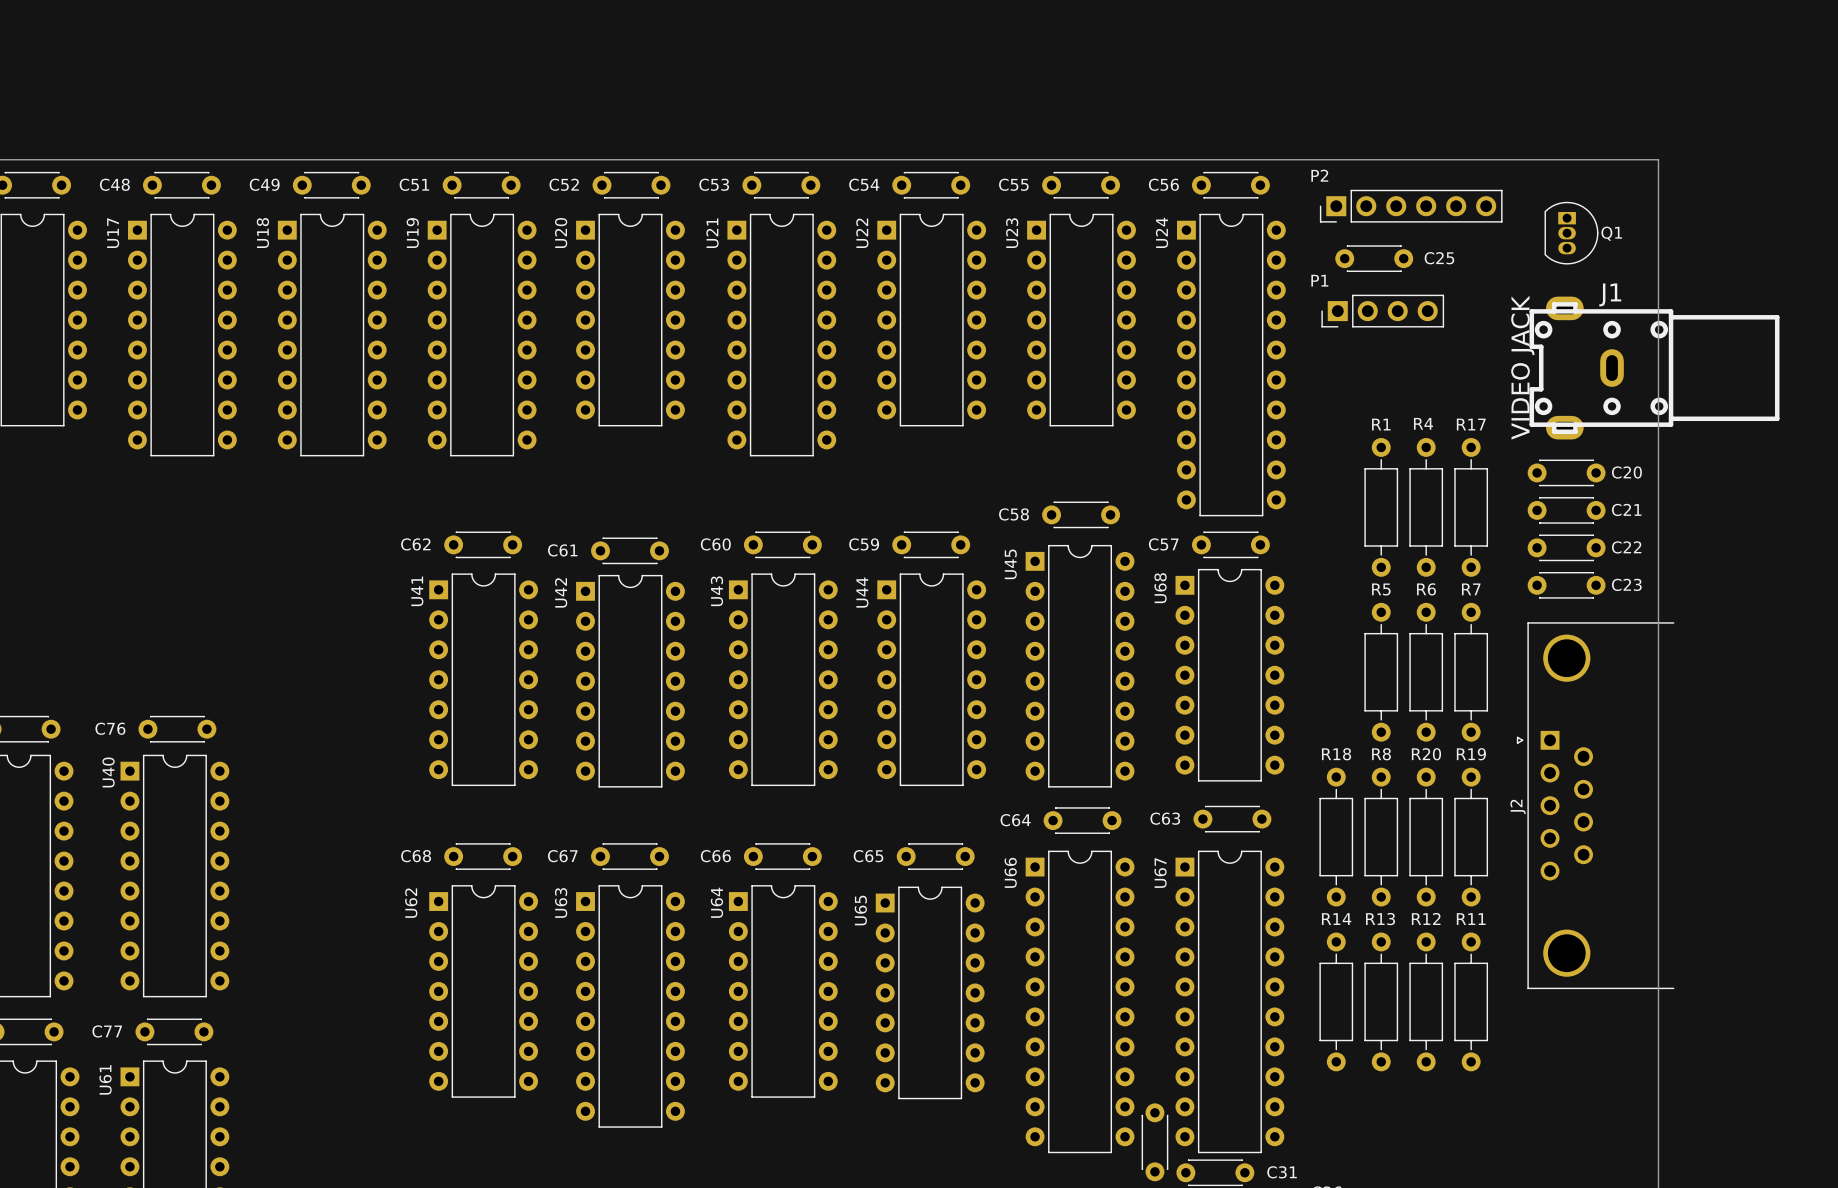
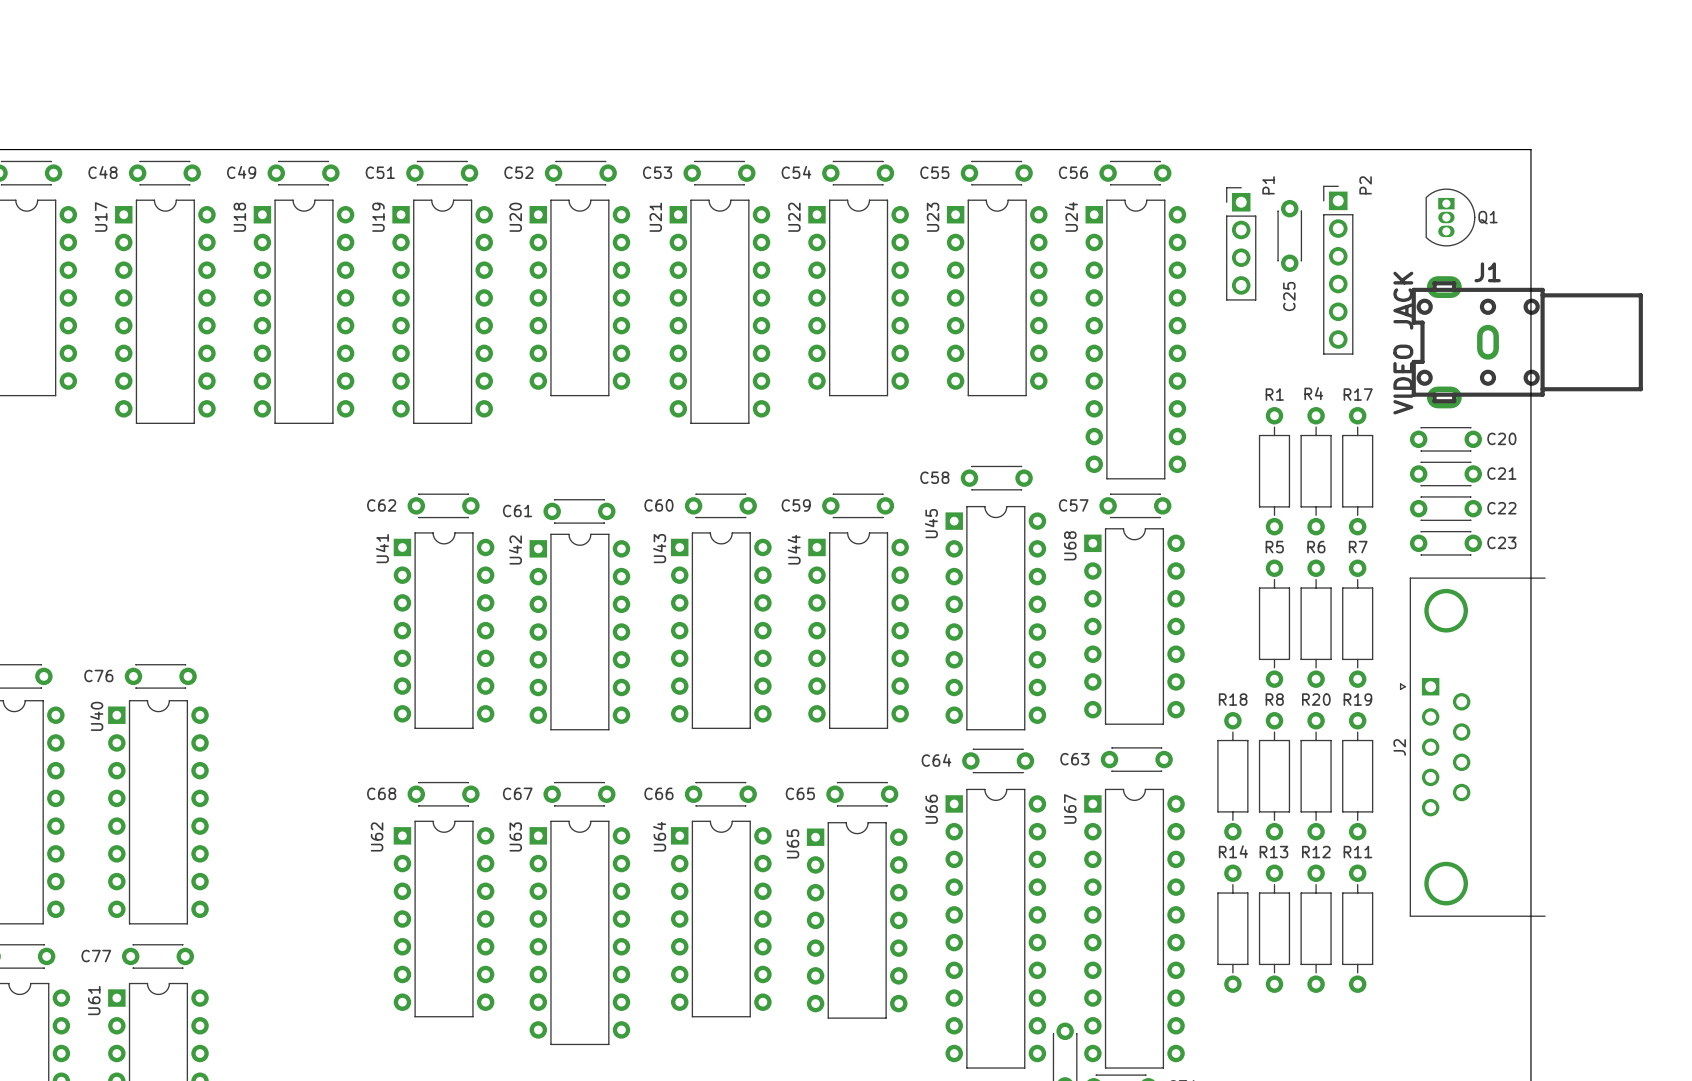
P2 rotation: 0° (1411, 206) -> 90° clockwise (1338, 270)
C25 rotation: 0° (1374, 258) -> 90° clockwise (1289, 235)
P1 rotation: 0° (1382, 311) -> 90° clockwise (1241, 243)

